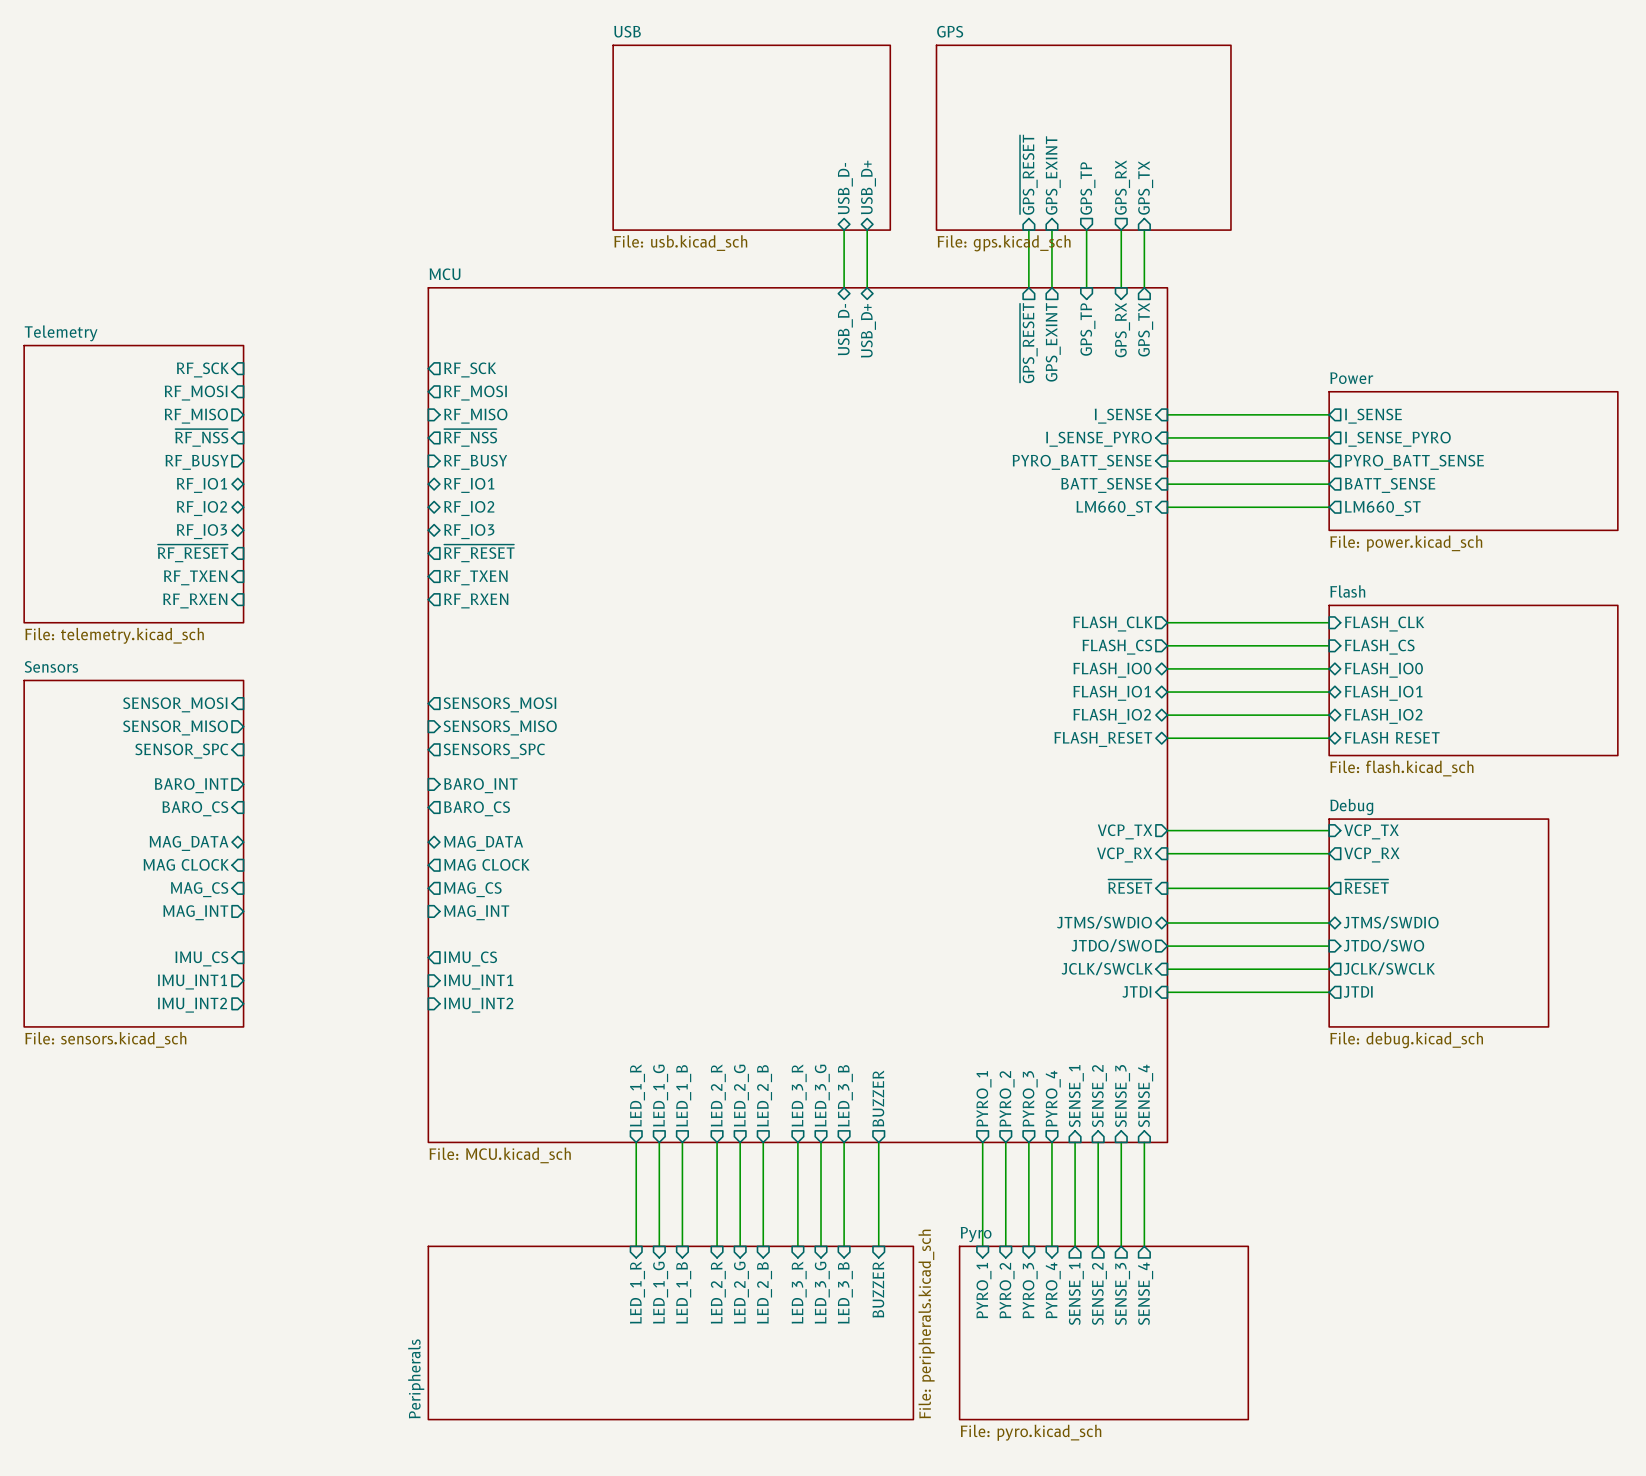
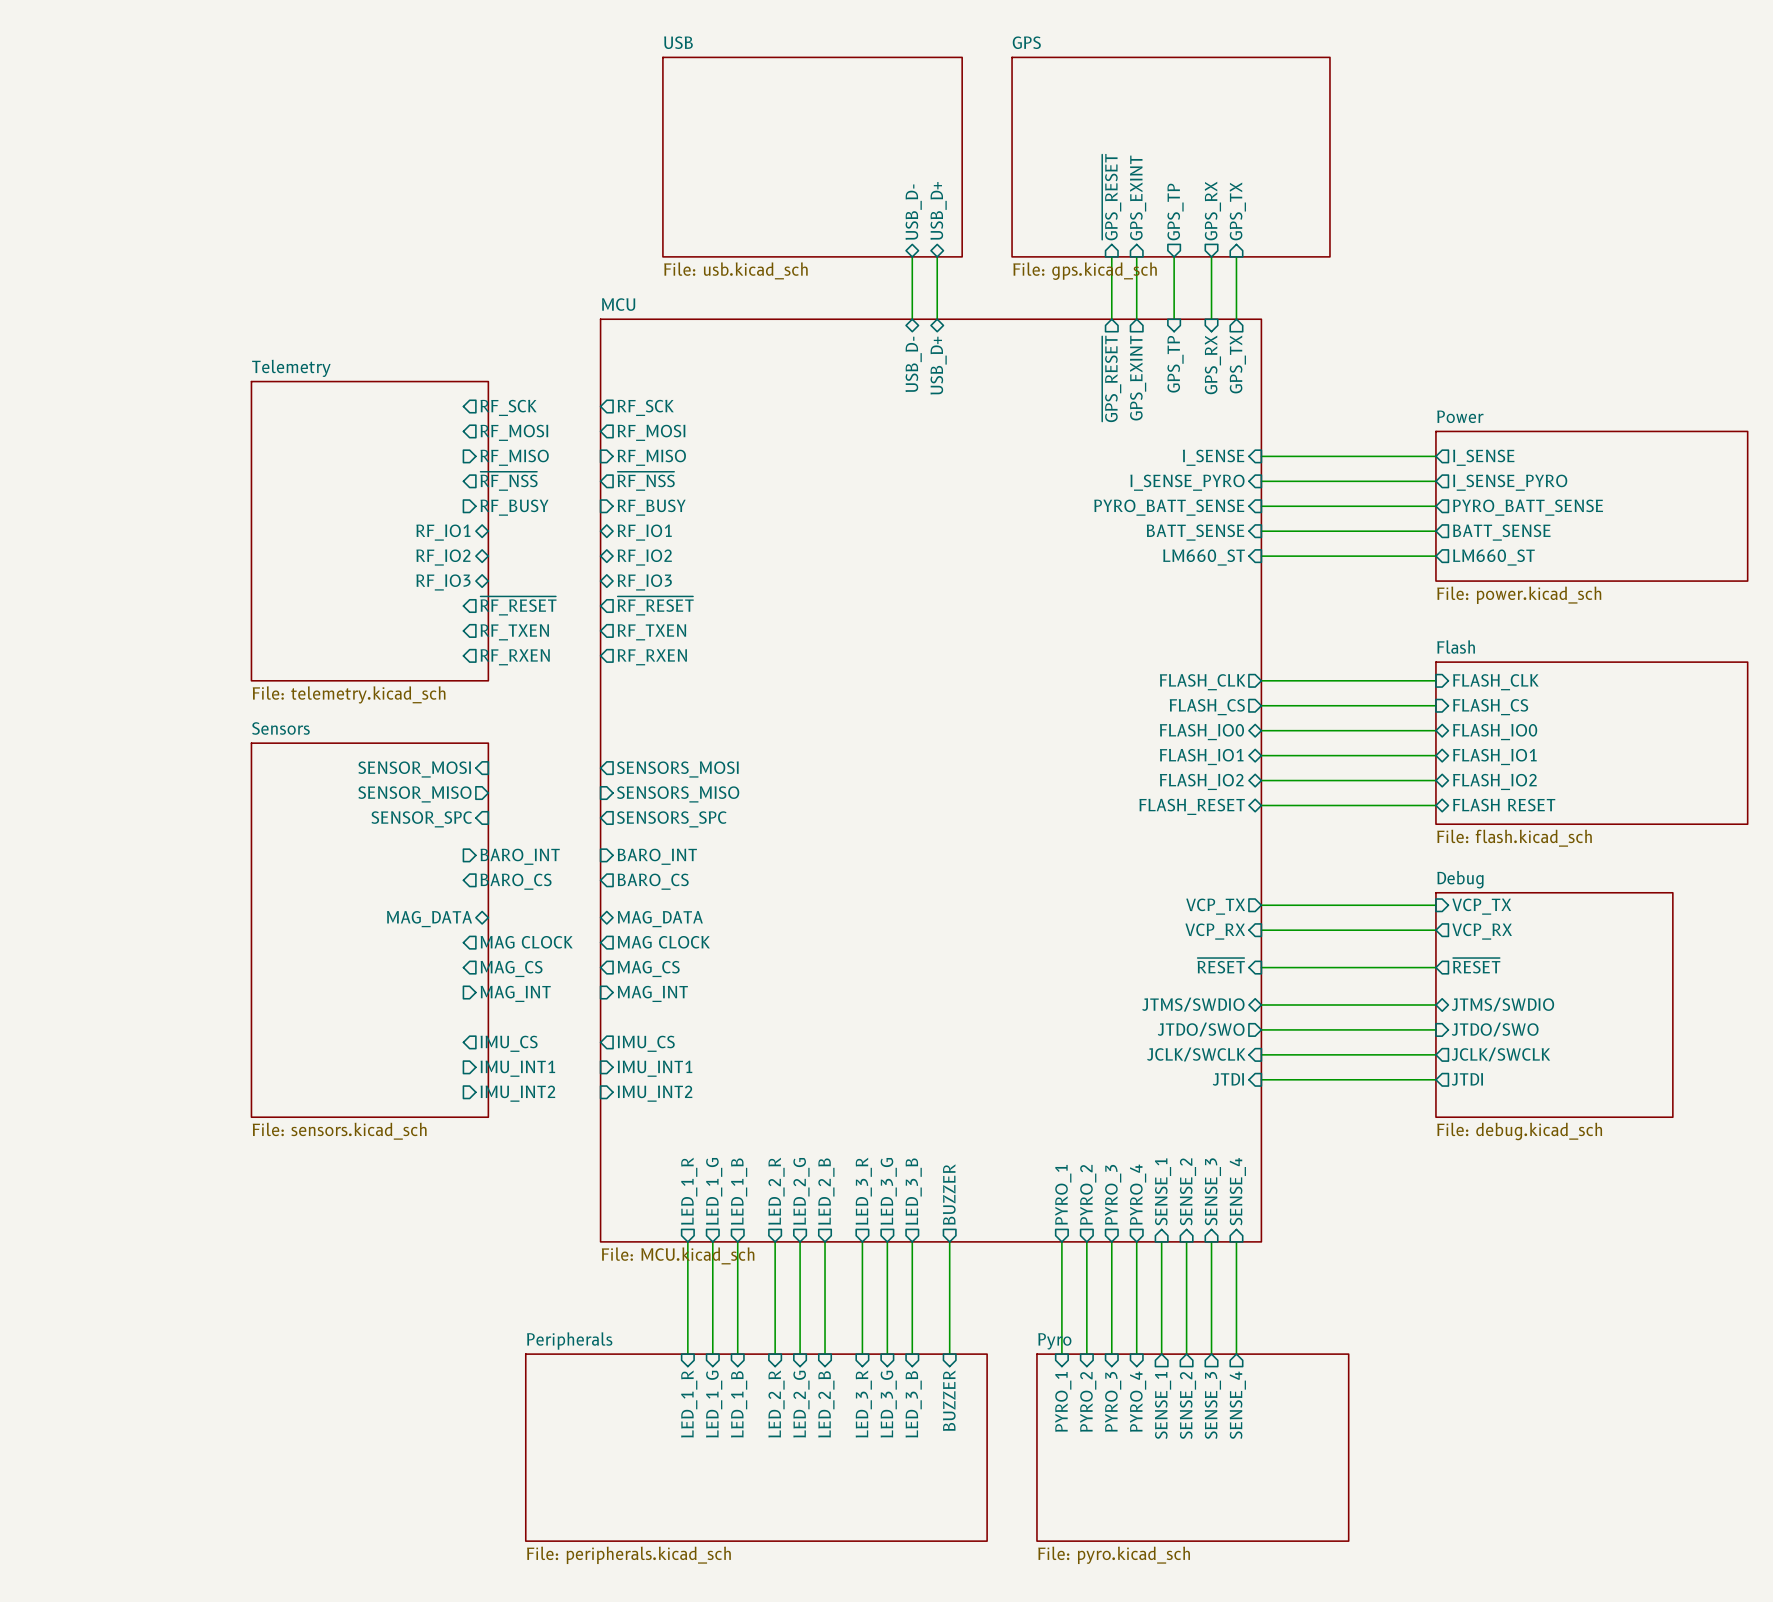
sheet pin: RF_SCK (202, 369) -> none
sheet pin: none -> RF_SCK (645, 407)
sheet pin: RF_MOSI (196, 393) -> none
sheet pin: none -> RF_MOSI (651, 432)
sheet pin: RF_MISO (196, 416) -> none
sheet pin: none -> RF_MISO (651, 457)
sheet pin: ~{RF_NSS} (201, 437) -> none
sheet pin: none -> ~{RF_NSS} (646, 481)
sheet pin: RF_BUSY (196, 462) -> none
sheet pin: none -> RF_BUSY (651, 507)
sheet Telemetry position: (133, 484) -> (369, 531)
sheet pin: RF_IO1 (201, 485) -> none
sheet pin rotation: 0° (469, 485) -> 180° (443, 532)
sheet pin position: RF_IO1 (469, 485) -> RF_IO1 (443, 532)
sheet pin: none -> RF_IO1 (644, 532)
sheet pin: RF_IO2 (201, 508) -> none
sheet pin rotation: 0° (469, 508) -> 180° (443, 557)
sheet pin position: RF_IO2 (469, 508) -> RF_IO2 (443, 557)
sheet pin: none -> RF_IO2 (644, 557)
sheet pin: RF_IO3 (201, 531) -> none
sheet pin rotation: 0° (469, 531) -> 180° (443, 582)
sheet pin position: RF_IO3 (469, 531) -> RF_IO3 (443, 582)
sheet pin: none -> RF_IO3 (644, 582)
sheet pin: ~{RF_RESET} (193, 553) -> none
sheet pin: none -> ~{RF_RESET} (655, 605)
sheet pin: RF_TXEN (195, 577) -> none
sheet pin: none -> RF_TXEN (651, 632)
sheet pin: RF_RXEN (195, 600) -> none
sheet pin: none -> RF_RXEN (652, 657)
sheet pin position: SENSOR_MOSI (175, 704) -> SENSOR_MOSI (414, 769)
sheet pin position: SENSORS_MOSI (499, 704) -> SENSORS_MOSI (677, 769)
sheet MCU: File: MCU.kicad_sch (797, 715) -> none
sheet MCU: none -> File: MCU.kicad_sch (930, 780)
sheet pin position: SENSOR_MISO (175, 727) -> SENSOR_MISO (414, 794)
sheet pin position: SENSORS_MISO (500, 727) -> SENSORS_MISO (678, 794)
sheet pin position: SENSOR_SPC (181, 751) -> SENSOR_SPC (421, 819)
sheet pin position: SENSORS_SPC (494, 751) -> SENSORS_SPC (671, 819)
sheet pin: BARO_INT (191, 785) -> none
sheet pin: none -> BARO_INT (657, 856)
sheet pin: BARO_CS (195, 808) -> none
sheet pin: none -> BARO_CS (653, 881)
sheet pin: MAG_DATA (189, 843) -> none
sheet pin rotation: 0° (483, 843) -> 180° (429, 919)
sheet pin position: MAG_DATA (483, 843) -> MAG_DATA (429, 919)
sheet pin: none -> MAG_DATA (660, 919)
sheet Sensors position: (133, 853) -> (369, 930)
sheet pin: MAG CLOCK (186, 864) -> none
sheet pin: none -> MAG CLOCK (663, 942)
sheet pin: MAG_CS (199, 889) -> none
sheet pin: none -> MAG_CS (648, 968)
sheet pin: MAG_INT (195, 912) -> none
sheet pin: none -> MAG_INT (652, 993)
sheet pin: IMU_CS (201, 958) -> none
sheet pin: none -> IMU_CS (646, 1043)
sheet pin: IMU_INT1 (192, 982) -> none
sheet pin: none -> IMU_INT1 (655, 1068)
sheet pin: IMU_INT2 (192, 1005) -> none
sheet pin: none -> IMU_INT2 (655, 1093)
sheet Peripherals: File: peripherals.kicad_sch (670, 1332) -> none
sheet Peripherals: none -> File: peripherals.kicad_sch (756, 1447)

